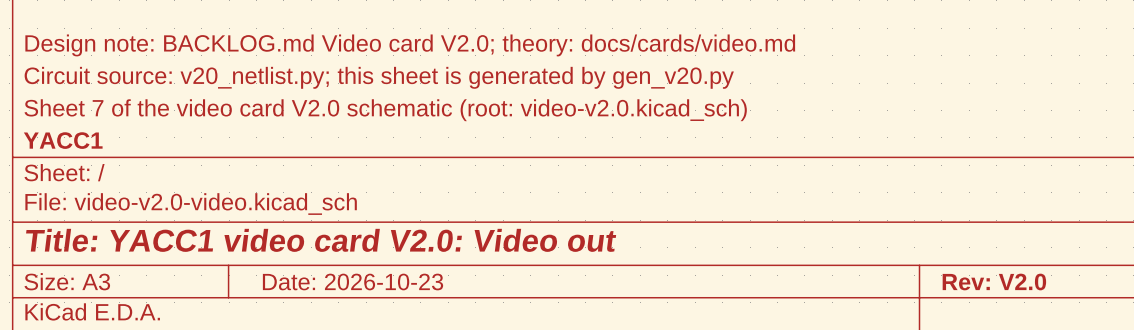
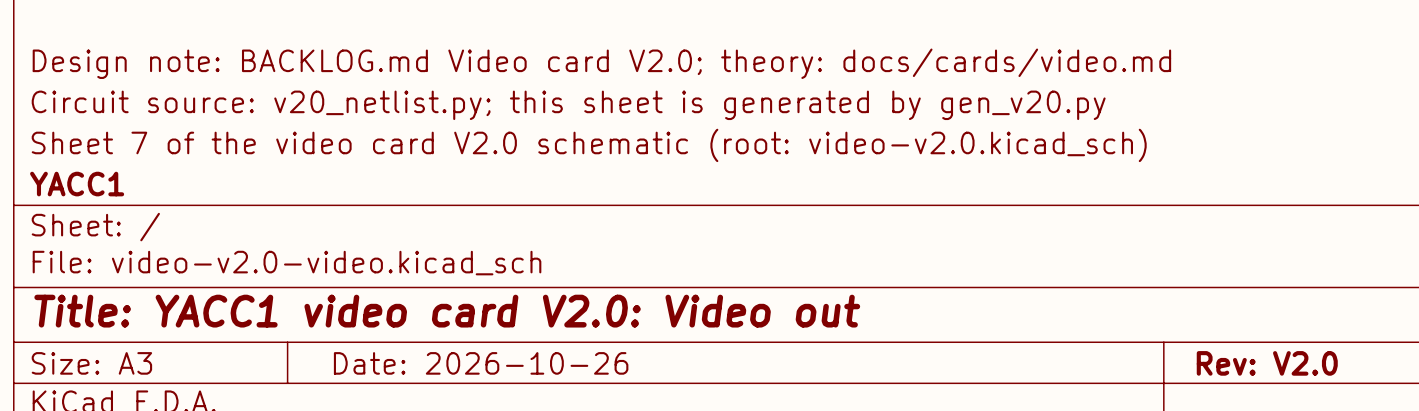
title block: Date: 2026-10-23 (353, 282) -> Date: 2026-10-26 (481, 363)

